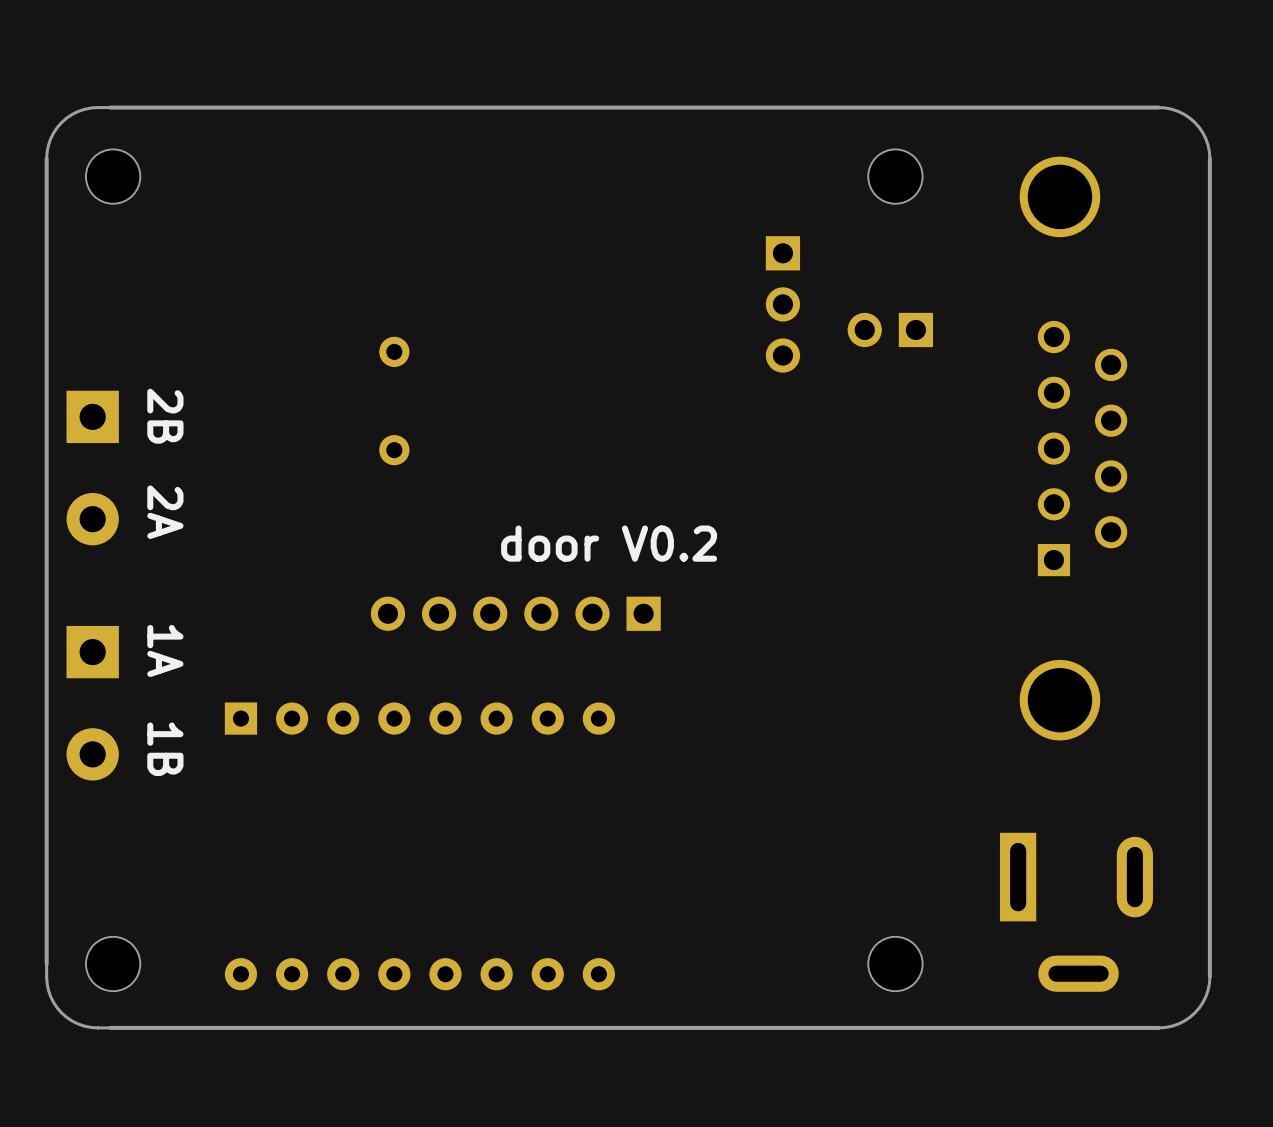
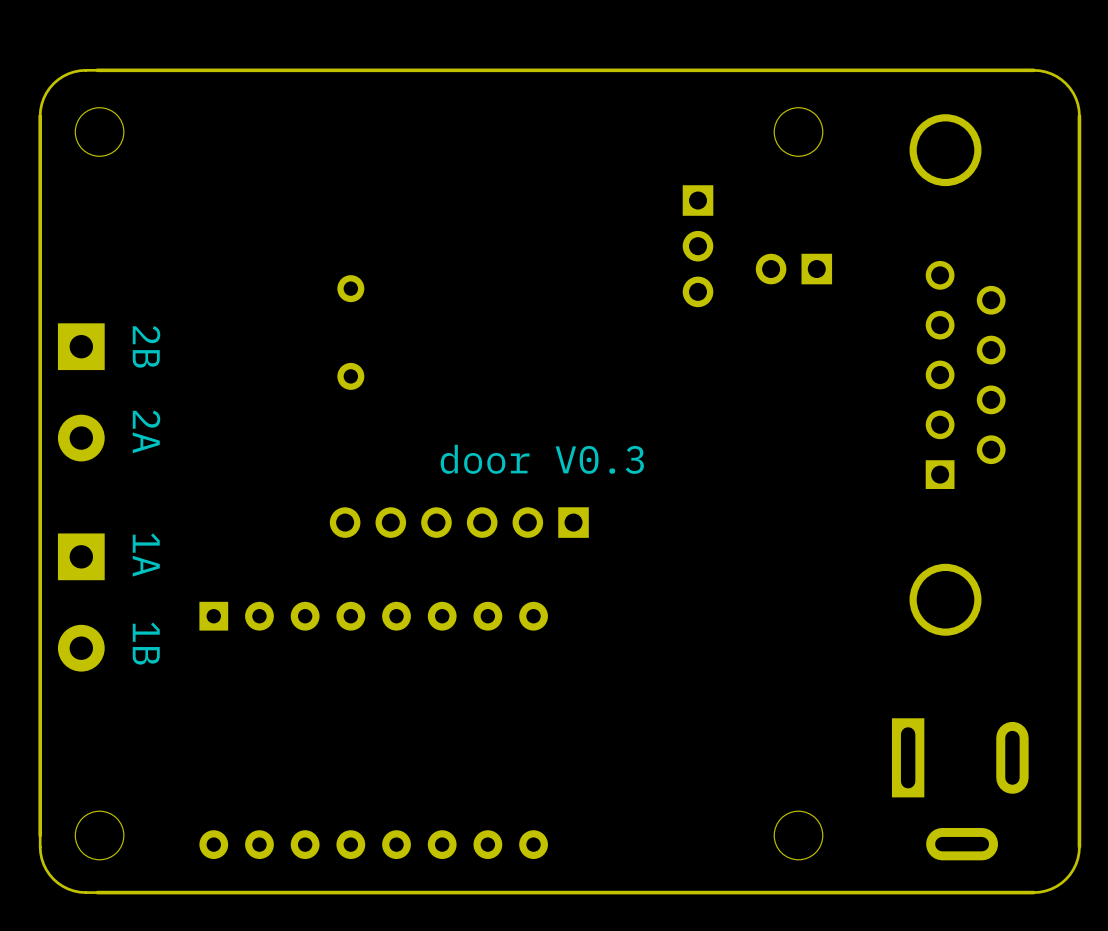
text: door V0.2 (609, 543) -> door V0.3 (542, 459)

